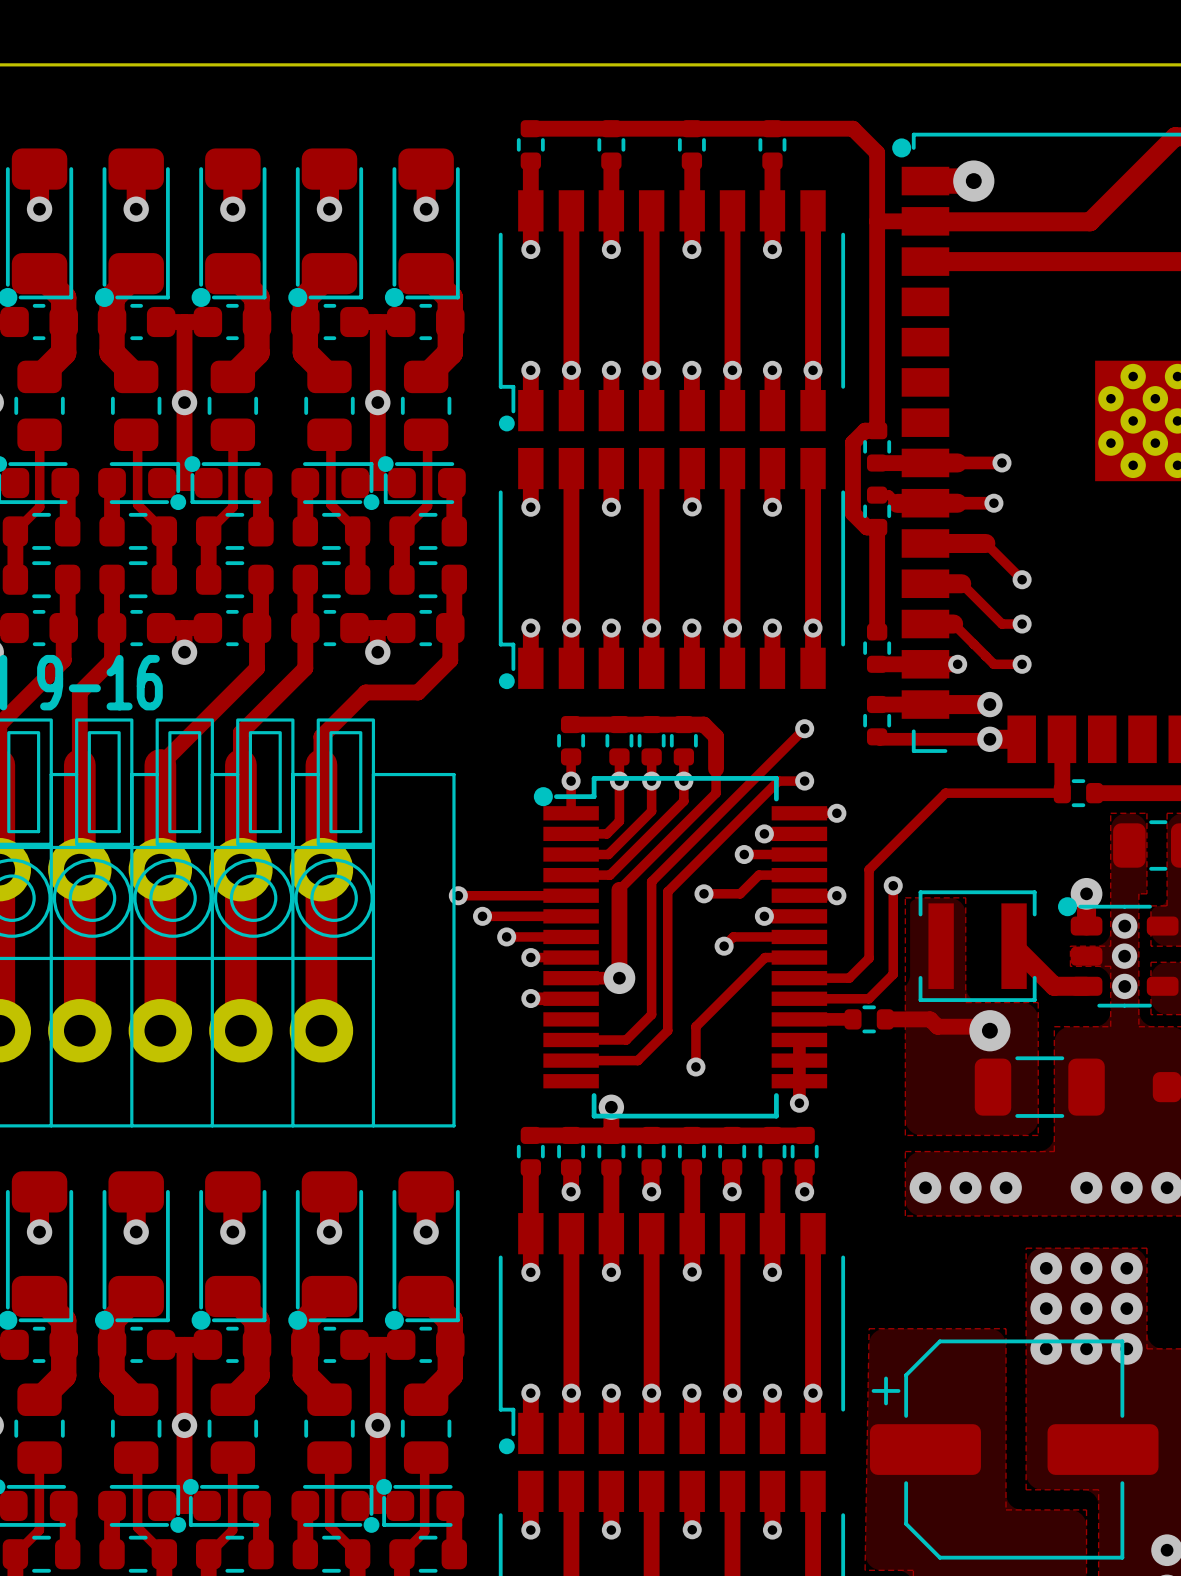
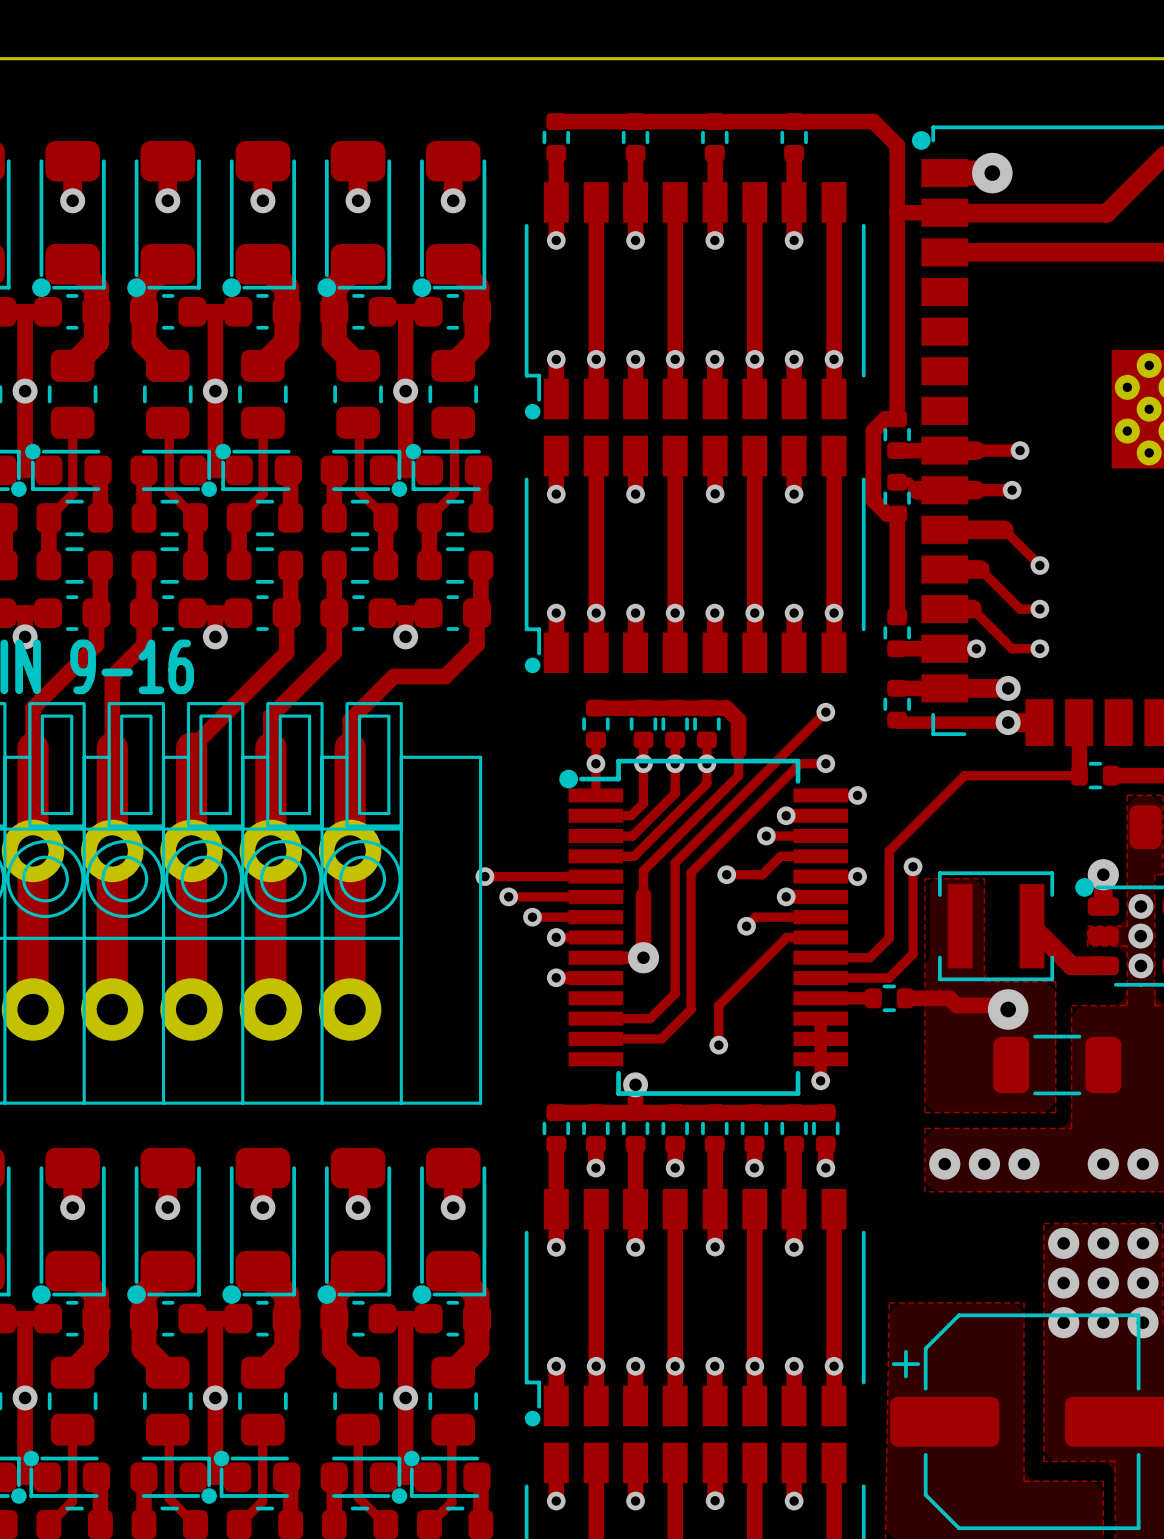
track width: thick (619, 889) (619, 914) -> thin (643, 870) (643, 895)

